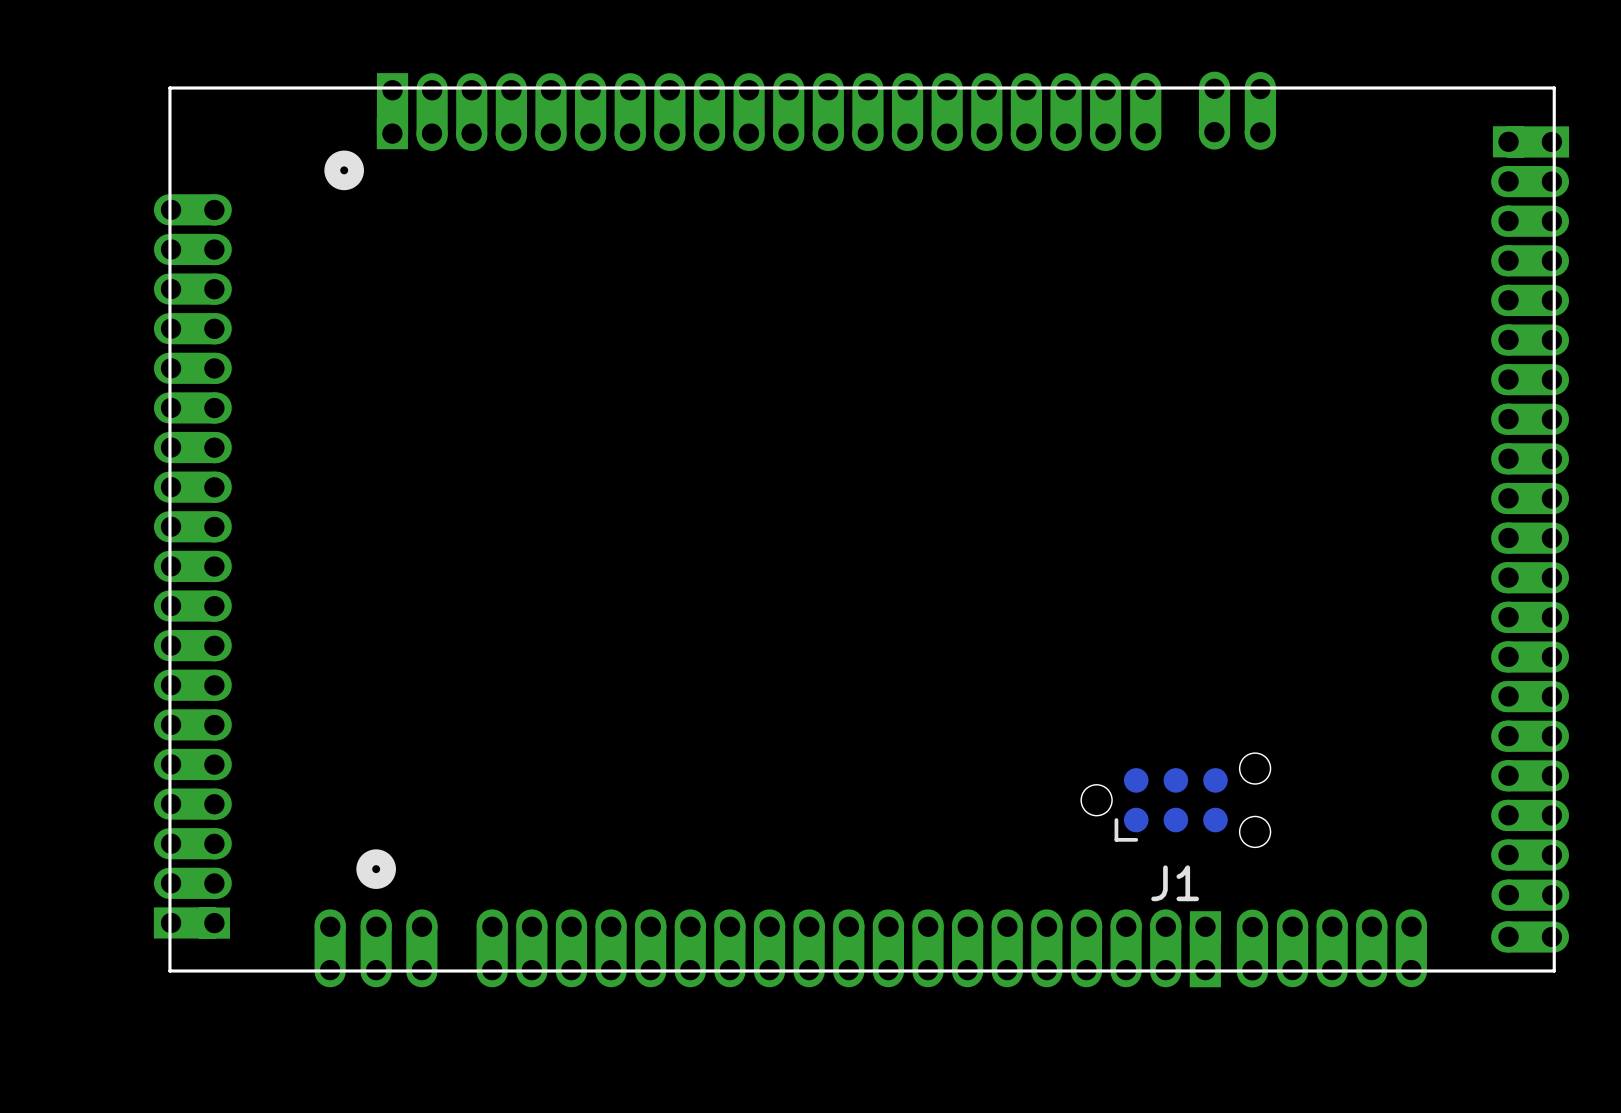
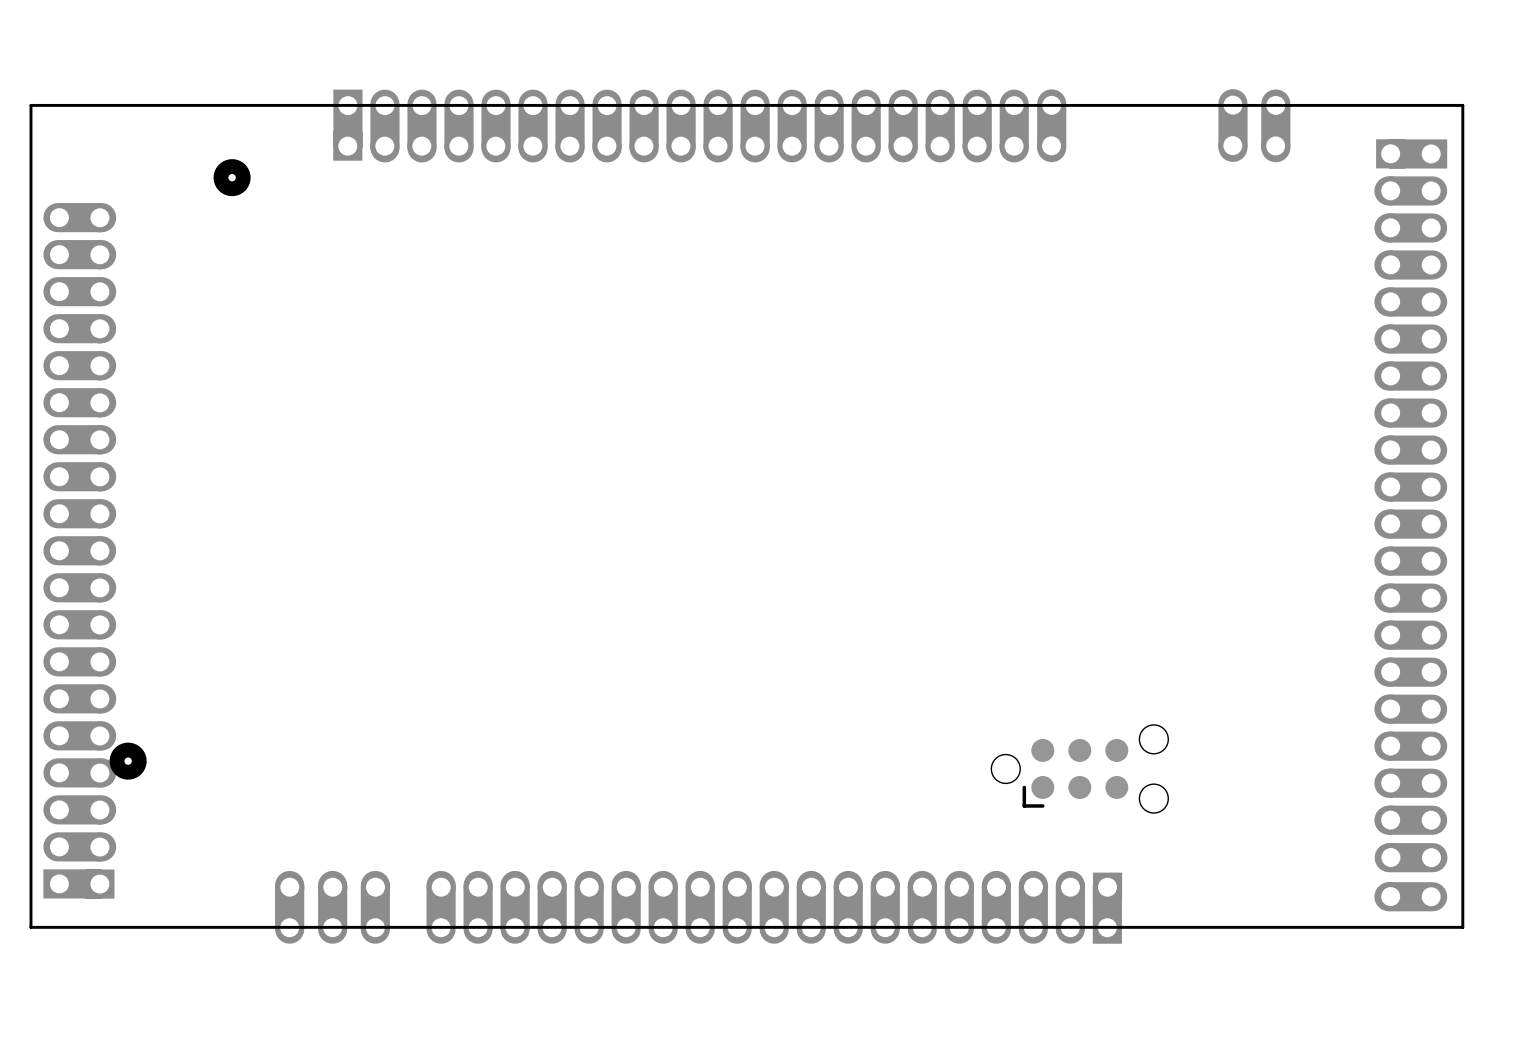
board edge: (1554, 88) (169, 88) (169, 970) (1554, 970) (1554, 88) -> (1462, 105) (1462, 927) (30, 927) (30, 105) (1462, 105)
part: (1214, 110) -> none
part: (1260, 110) -> none
part: none -> (1232, 125)
part: none -> (1275, 125)
part position: (344, 170) -> (232, 177)
part position: (192, 566) -> (79, 550)
part position: (376, 869) -> (128, 761)
J1 name: J1 (1175, 883) -> none
part: (1252, 948) -> none
part: (1352, 948) -> none

